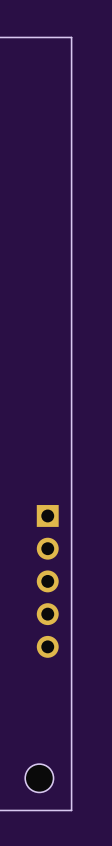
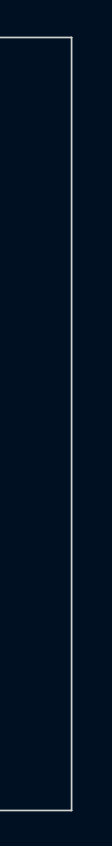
part: (47, 581) -> none
part: (39, 778) -> none

